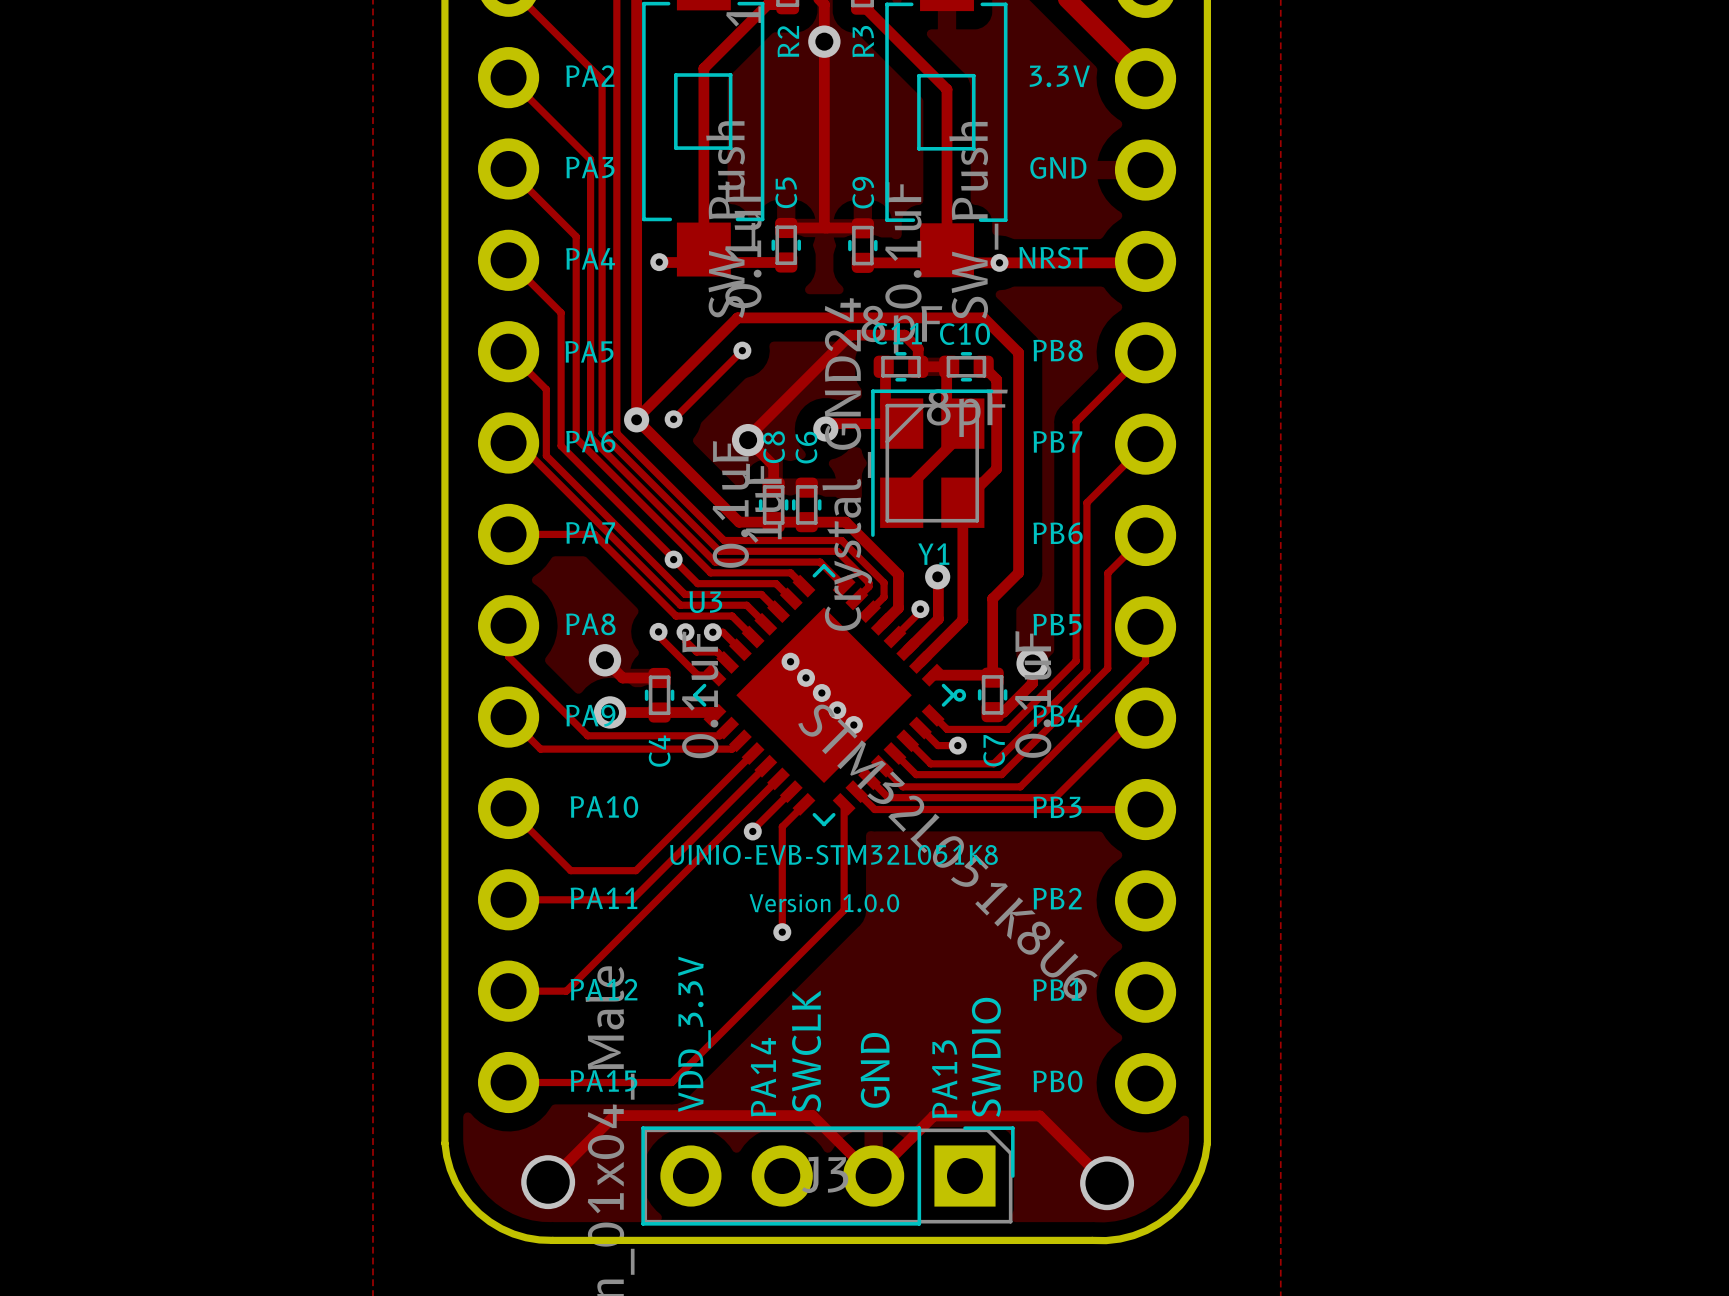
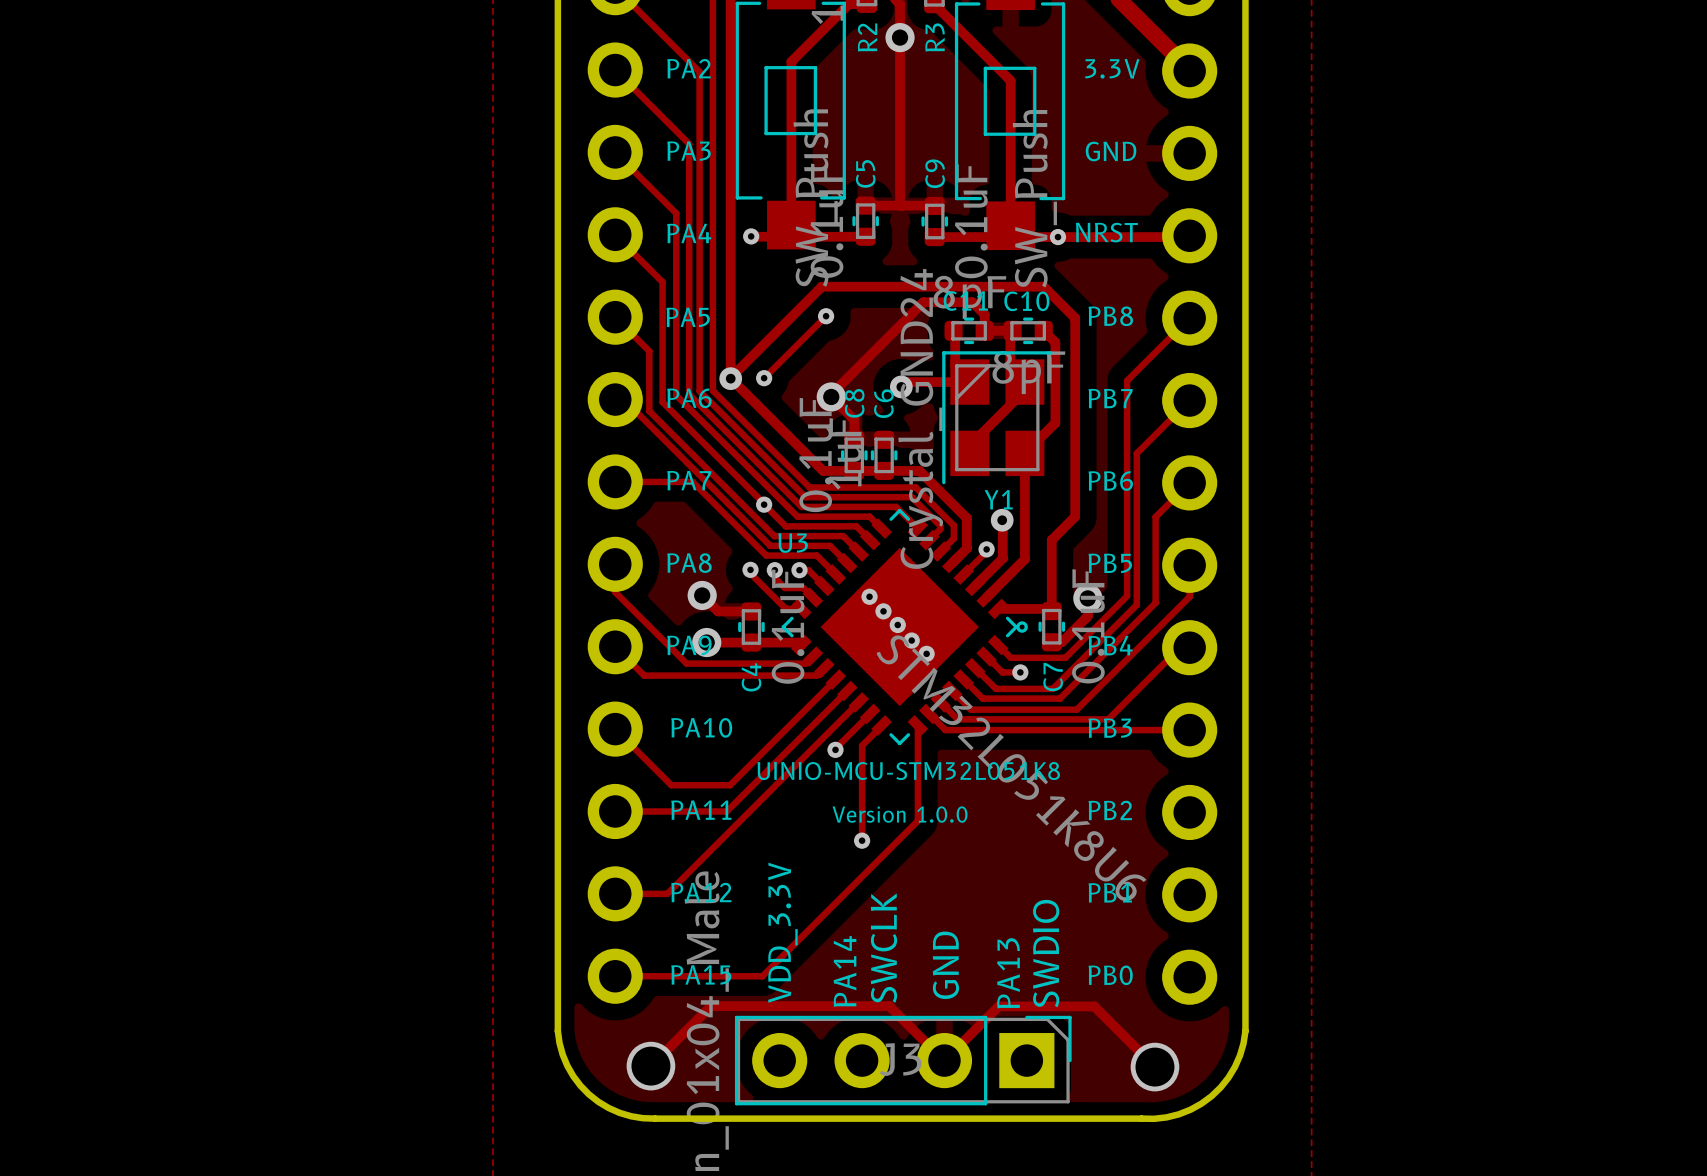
text: UINIO-EVB-STM32L051K8 (833, 854) -> UINIO-MCU-STM32L051K8 (908, 771)

